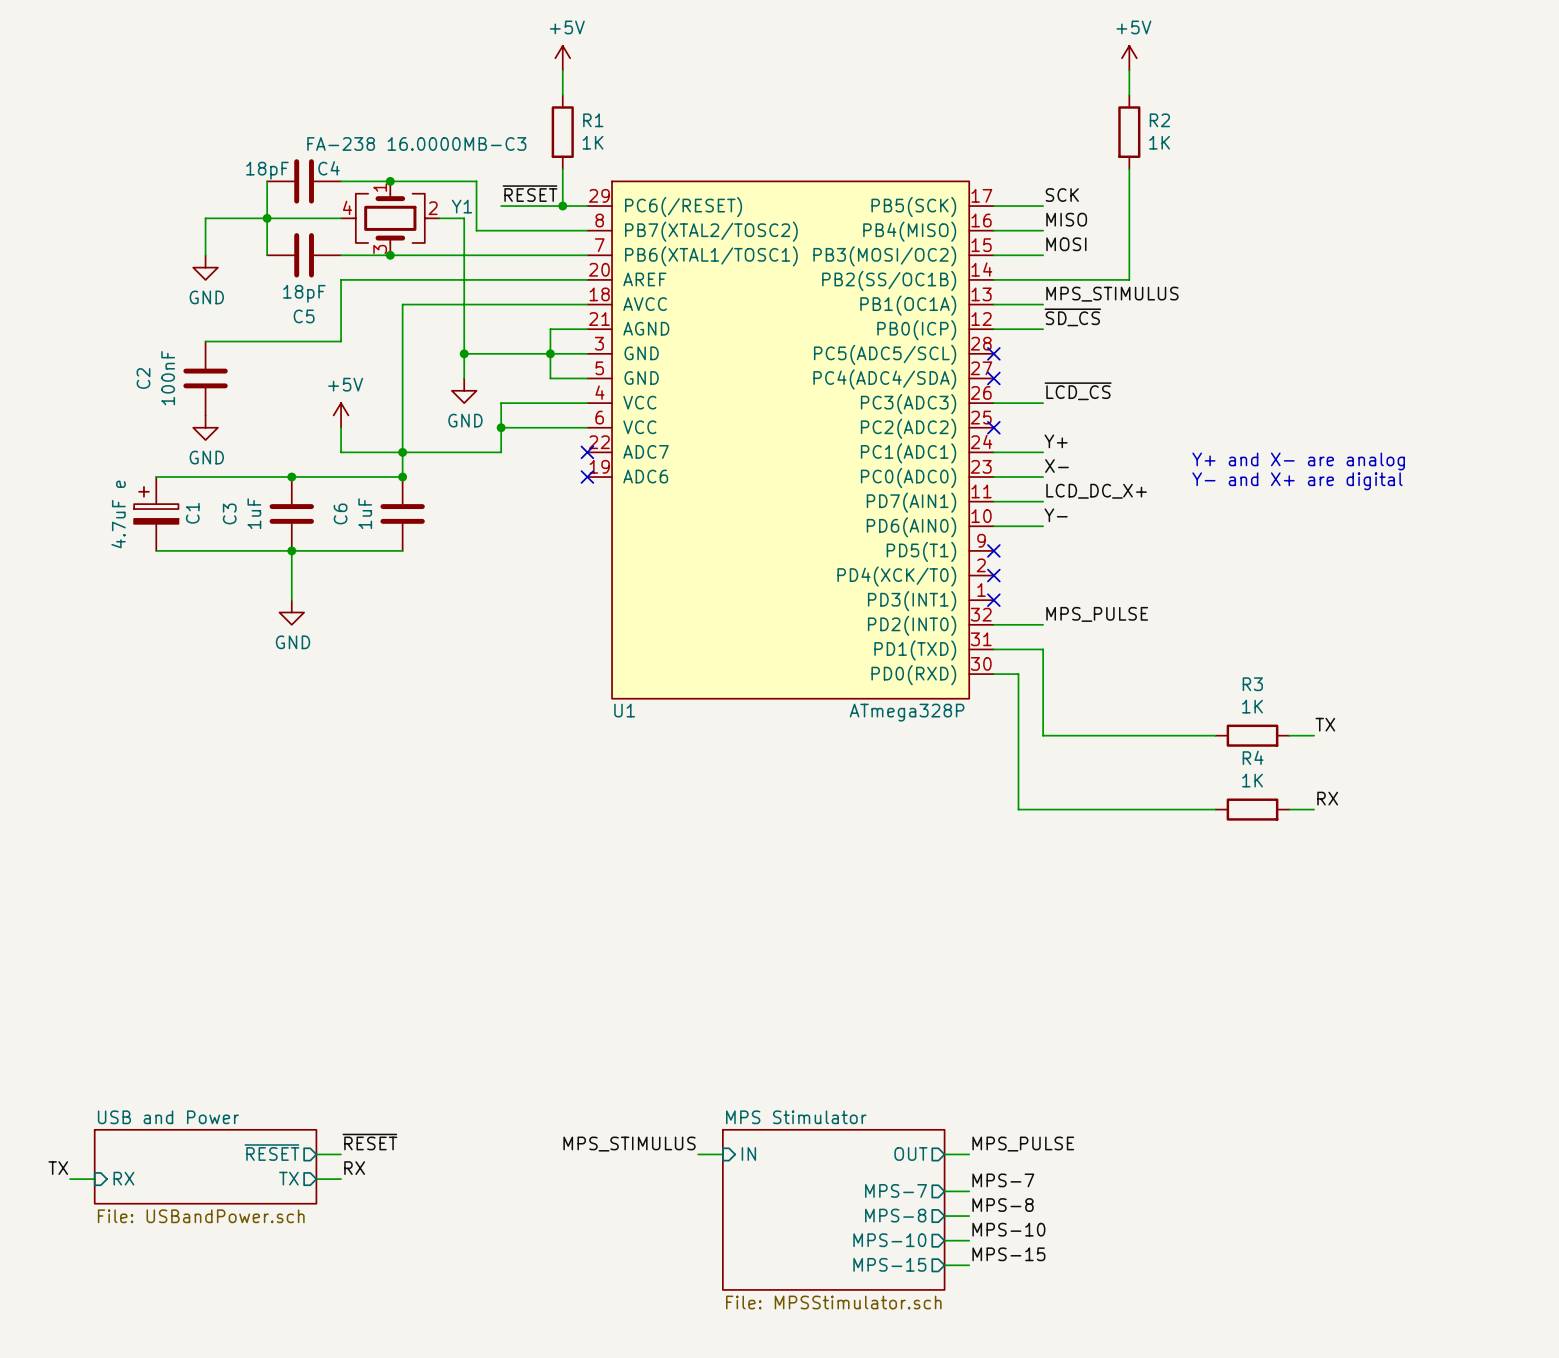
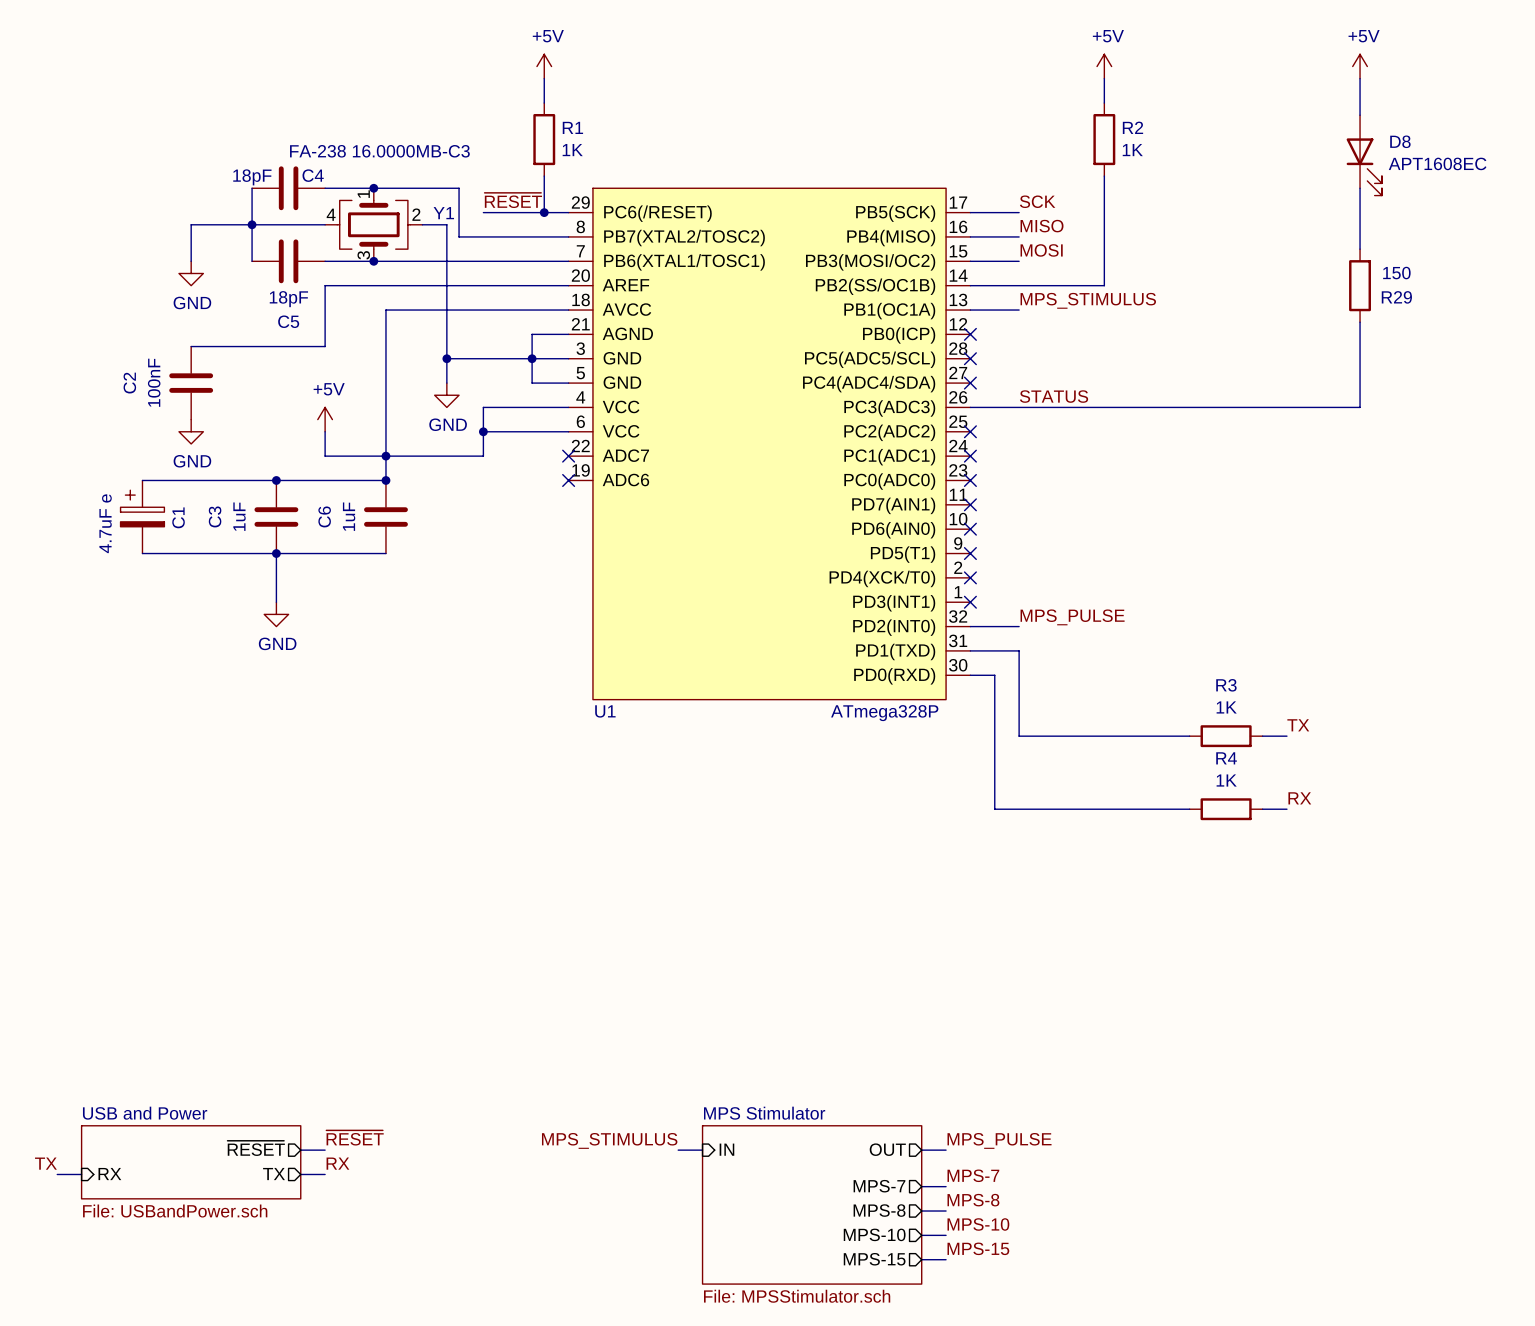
power symbol: none -> +5V (1360, 66)
wire: none -> (1360, 78) (1360, 115)
D8: none -> APT1608EC (1364, 155)
wire: none -> (1360, 188) (1360, 249)
R29: none -> 150 (1360, 285)
wire: none -> (1360, 322) (1360, 407) (1019, 407)
label: ~{SD_CS} (1072, 317) -> none
wire: (993, 329) (1043, 329) -> none
no-connect mark: none -> (970, 334)
label: ~{LCD_CS} (1078, 391) -> STATUS (1054, 396)
label: Y+ (1056, 441) -> none
wire: (993, 452) (1043, 452) -> none
no-connect mark: none -> (970, 456)
text: Y+ and X- are analog (1298, 461) -> none
label: X- (1057, 466) -> none
wire: (993, 477) (1043, 477) -> none
no-connect mark: none -> (970, 480)
text: Y- and X+ are digital (1297, 481) -> none
label: LCD_DC_X+ (1096, 491) -> none
wire: (993, 501) (1043, 501) -> none
no-connect mark: none -> (970, 504)
label: Y- (1056, 515) -> none
wire: (993, 526) (1043, 526) -> none
no-connect mark: none -> (970, 529)

